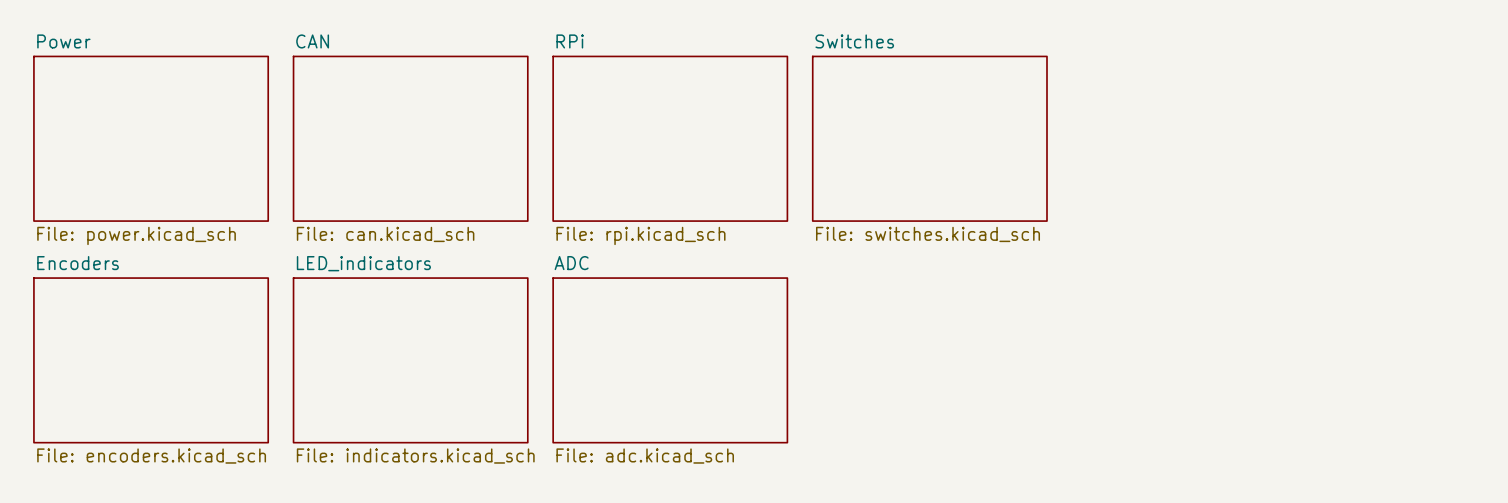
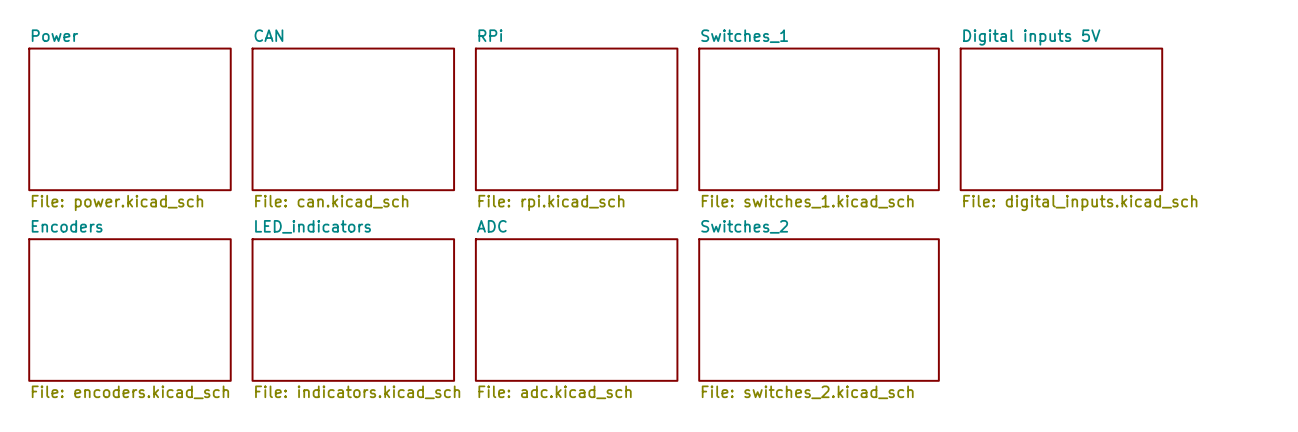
sheet Switches: File: switches.kicad_sch (929, 138) -> none
sheet Switches_1: none -> File: switches_1.kicad_sch (819, 119)
sheet Digital inputs 5V: none -> File: digital_inputs.kicad_sch (1061, 119)
sheet Switches_2: none -> File: switches_2.kicad_sch (819, 310)

